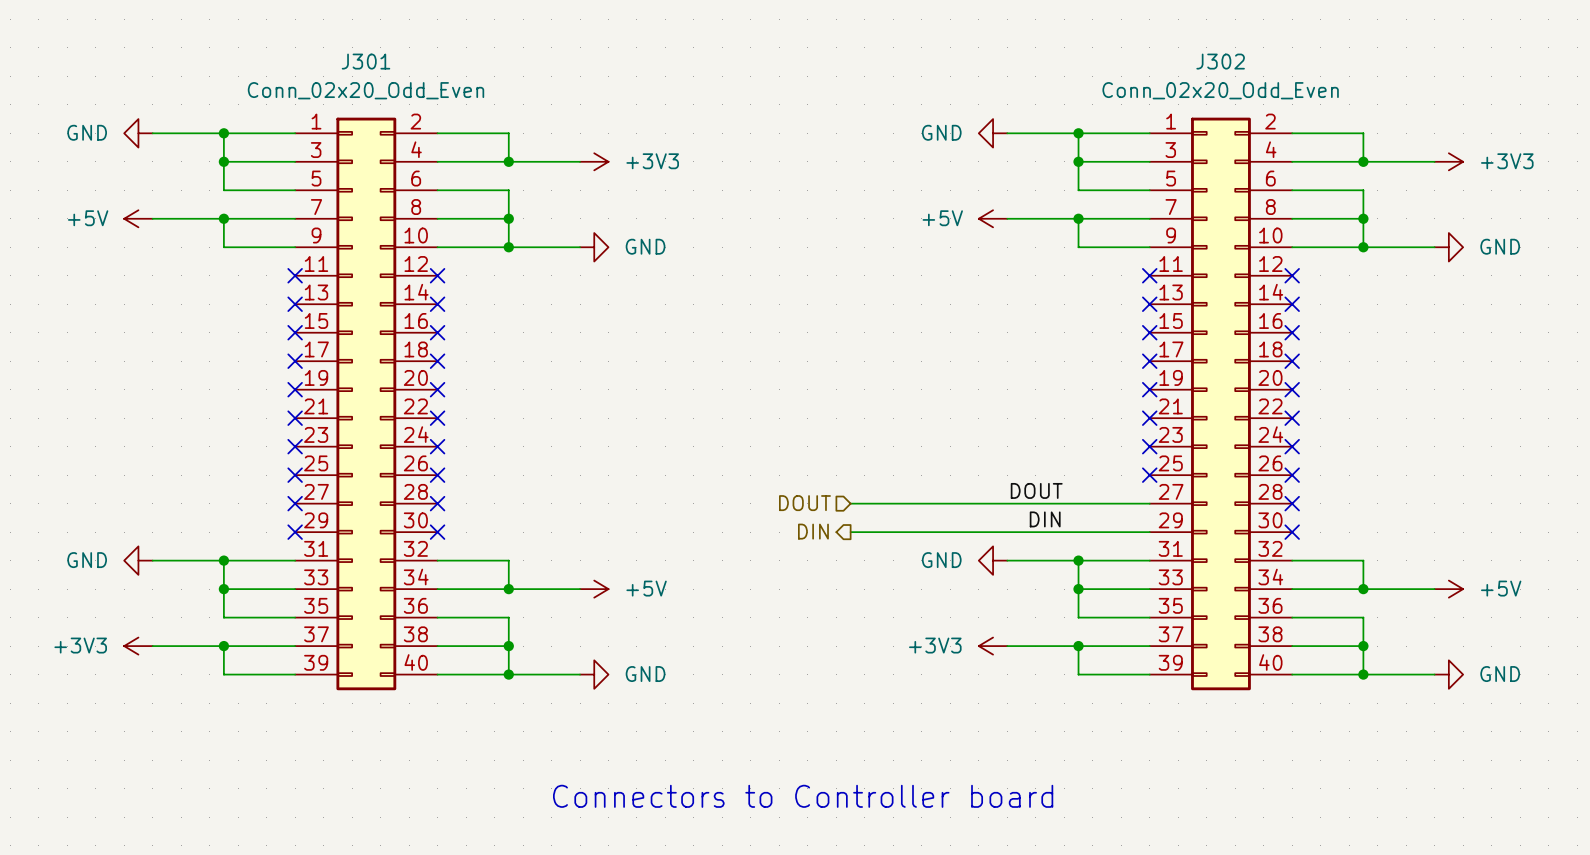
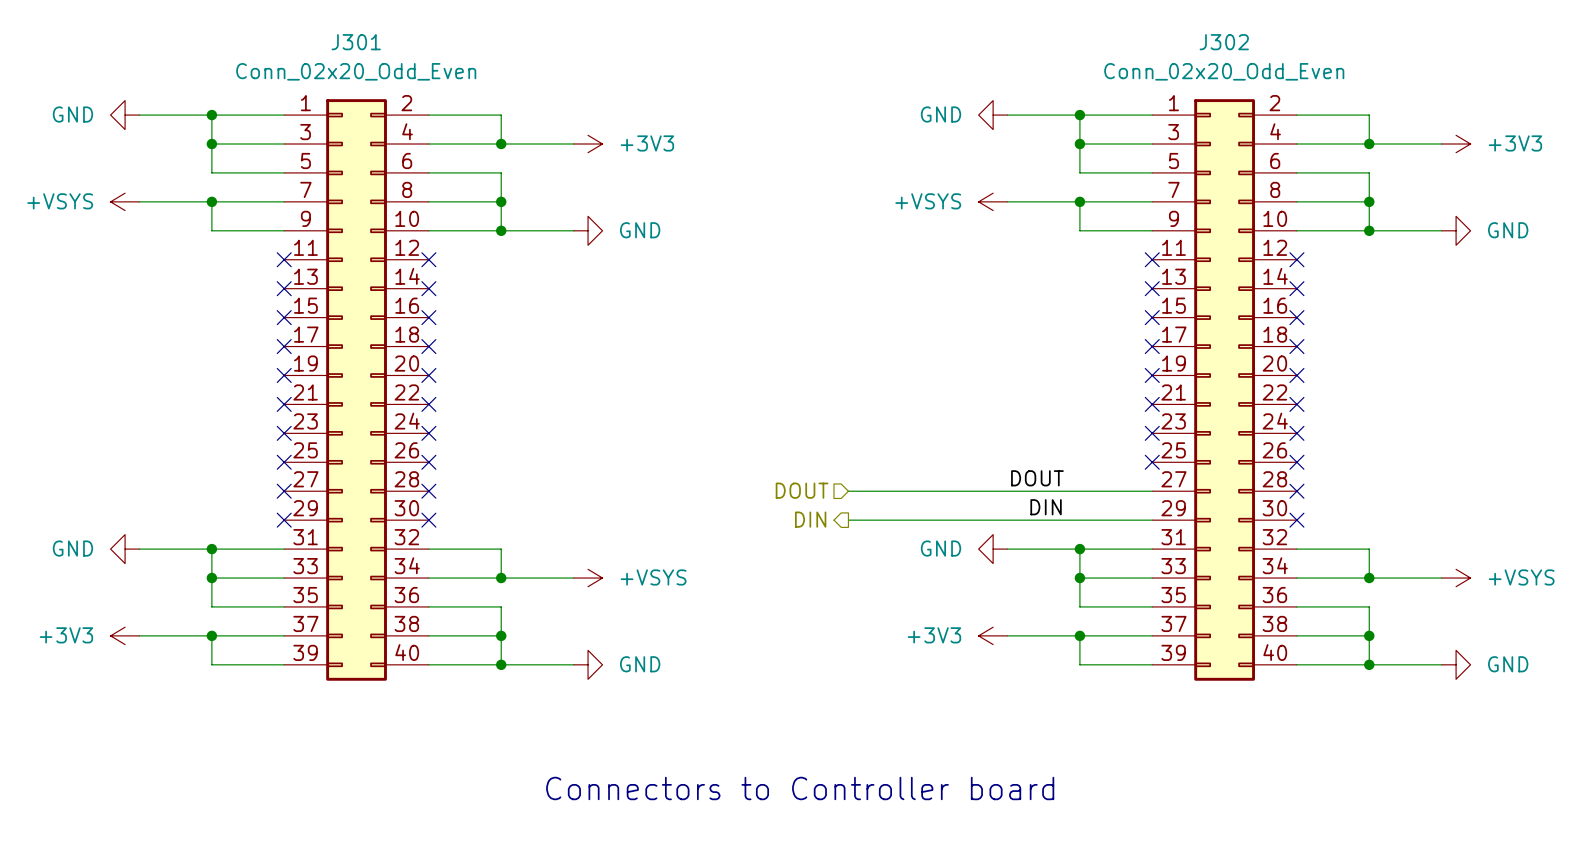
power symbol: +5V (138, 218) -> +VSYS (125, 201)
power symbol: +5V (993, 218) -> +VSYS (993, 201)
power symbol: +5V (594, 589) -> +VSYS (588, 578)
power symbol: +5V (1448, 589) -> +VSYS (1456, 578)

